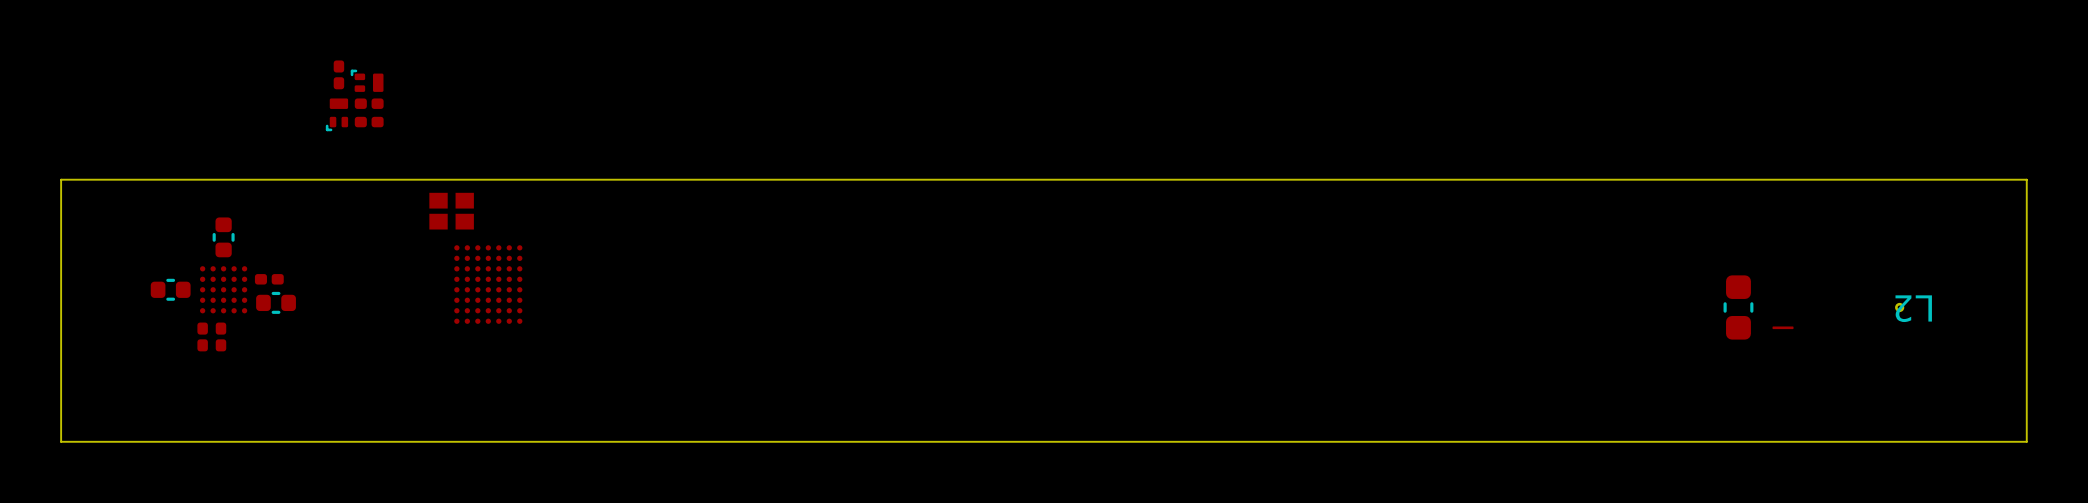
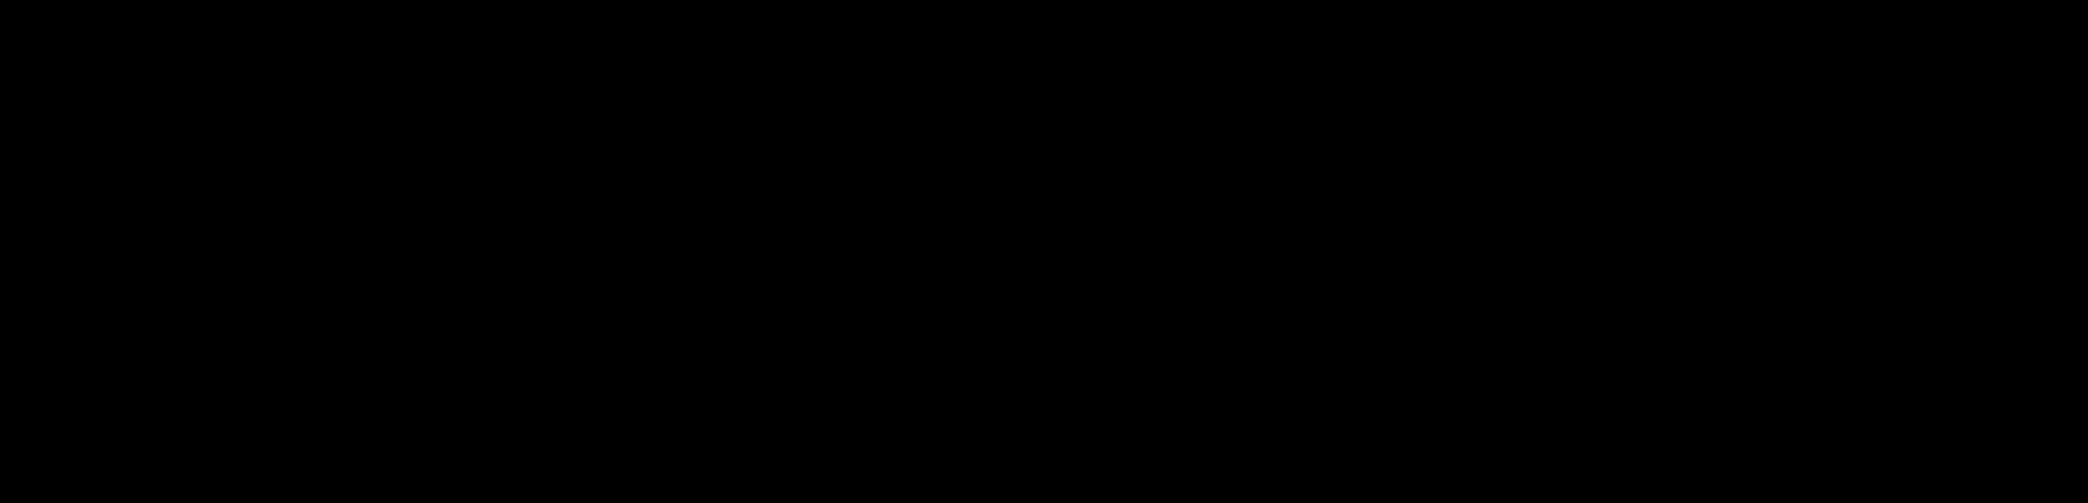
part: (338, 74) -> none
part: (367, 80) -> none
part: (369, 103) -> none
part: (336, 114) -> none
part: (369, 122) -> none
board edge: (61, 179) (2026, 179) (2026, 441) (61, 441) (61, 179) -> none
part: (451, 211) -> none
part: (223, 237) -> none
part: (269, 279) -> none
part: (488, 284) -> none
part: (170, 289) -> none
part: (223, 289) -> none
part: (276, 302) -> none
part: (1738, 307) -> none
L2: (1838, 315) -> none
part: (202, 336) -> none
part: (220, 336) -> none

